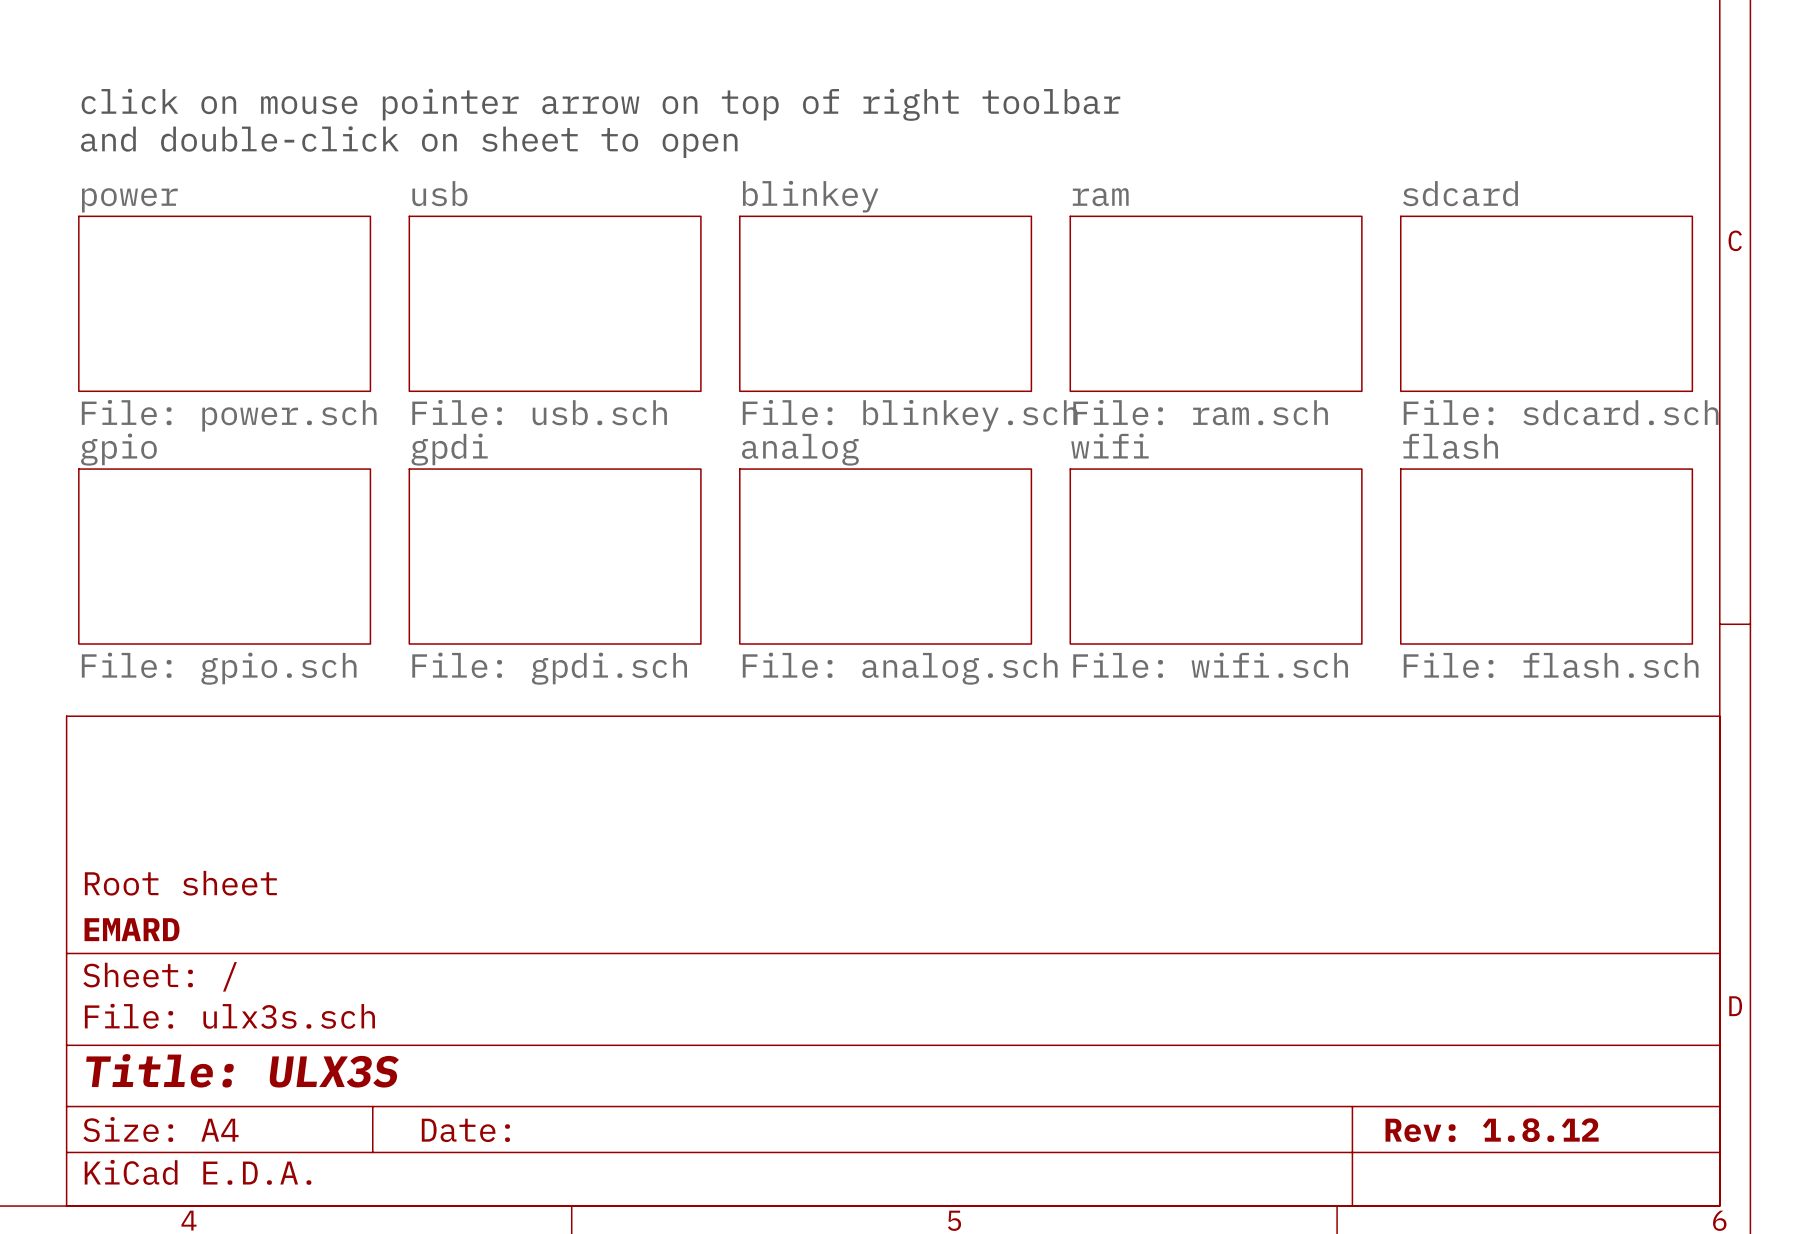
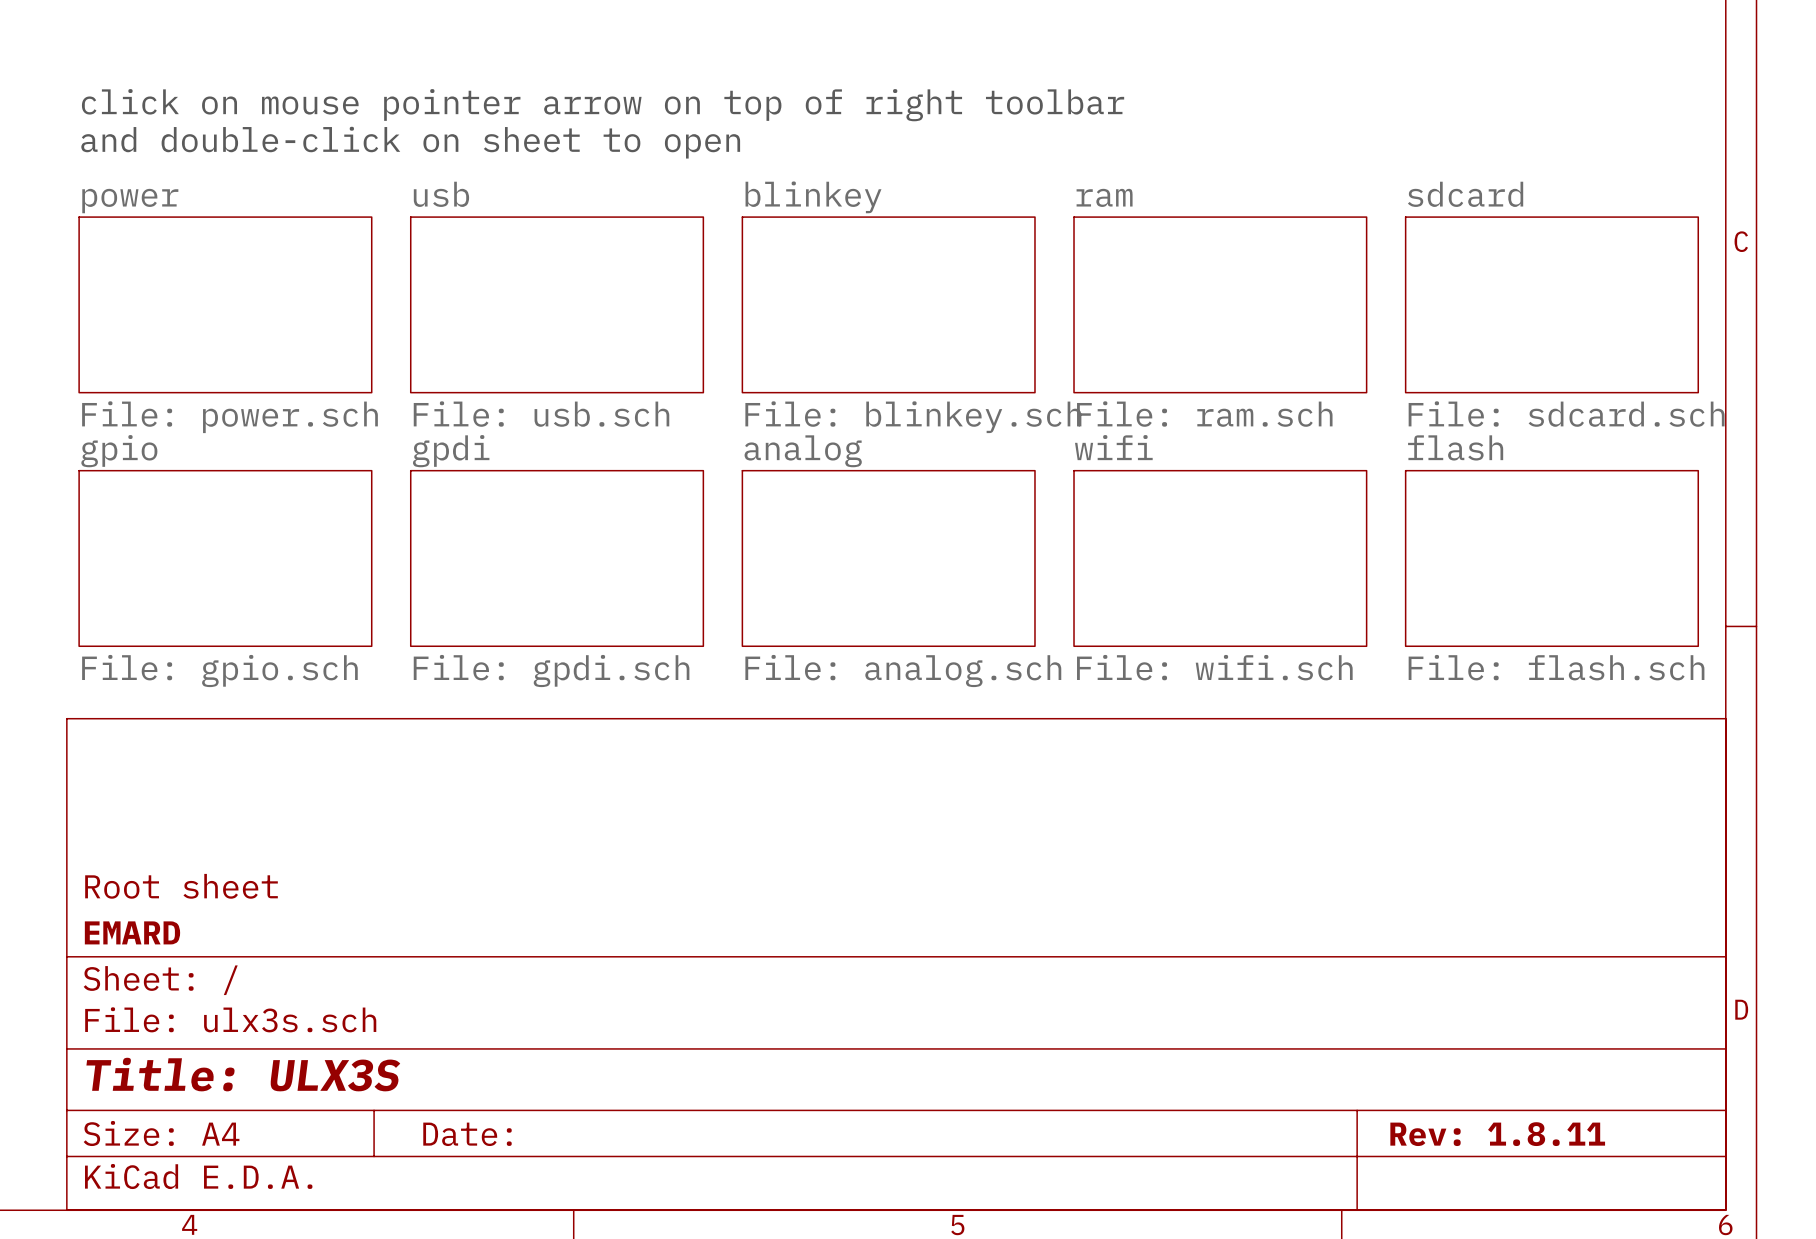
title block: Rev: 1.8.12 (1492, 1130) -> Rev: 1.8.11 (1497, 1134)

